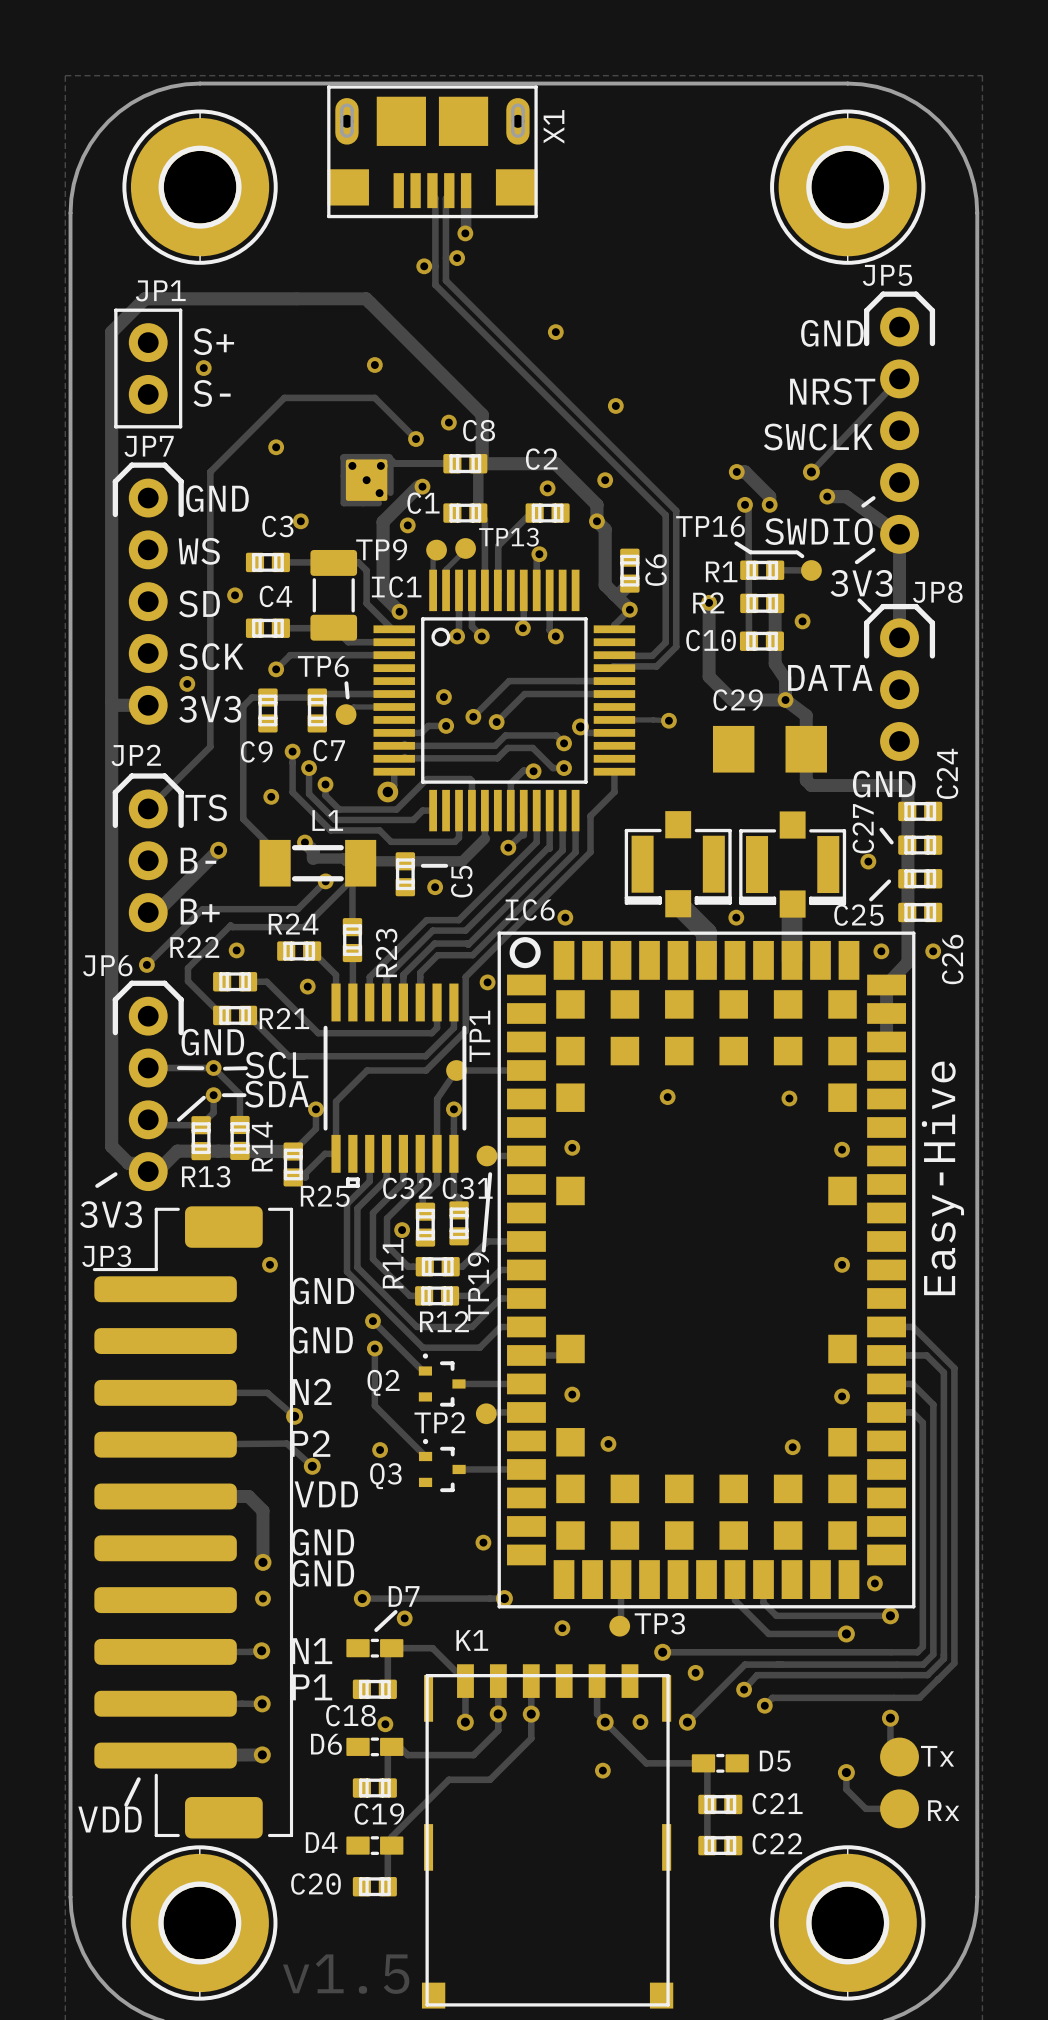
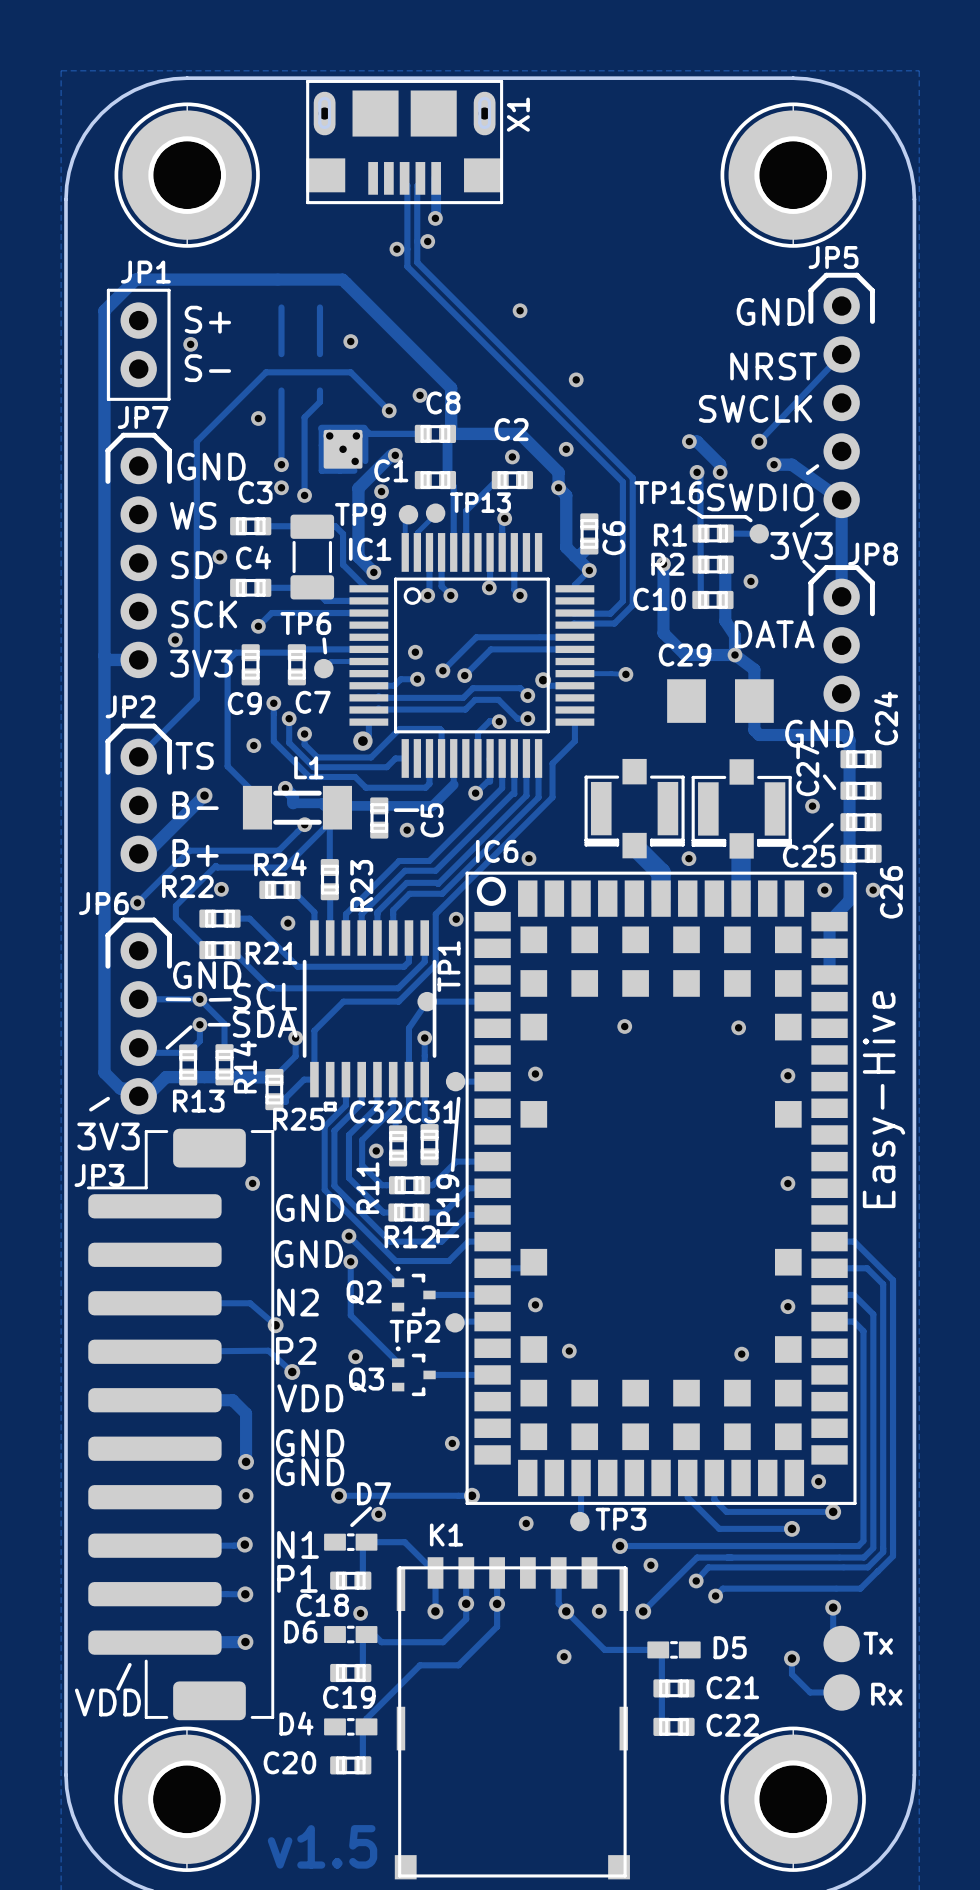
track: none -> (281, 307) (281, 354)
track: none -> (319, 307) (319, 354)
track: none -> (281, 390) (281, 464)
track: none -> (319, 390) (319, 402) (304, 417) (304, 495)
via: none -> (281, 464)
via: none -> (304, 495)

